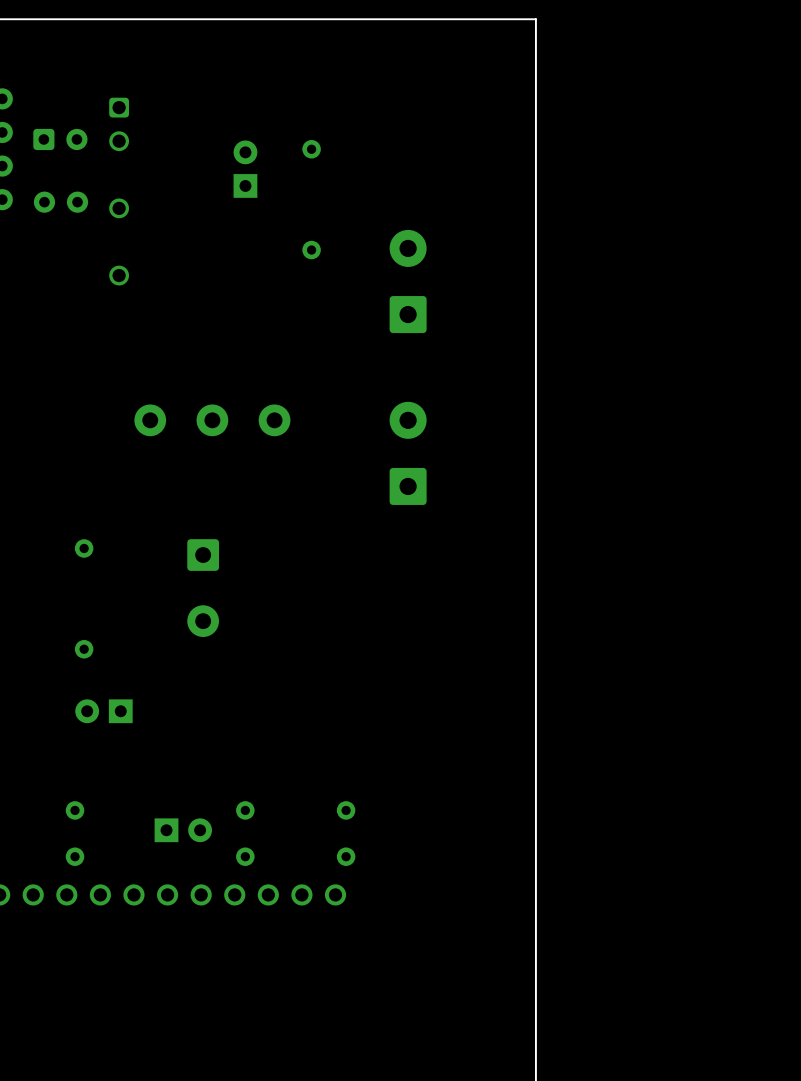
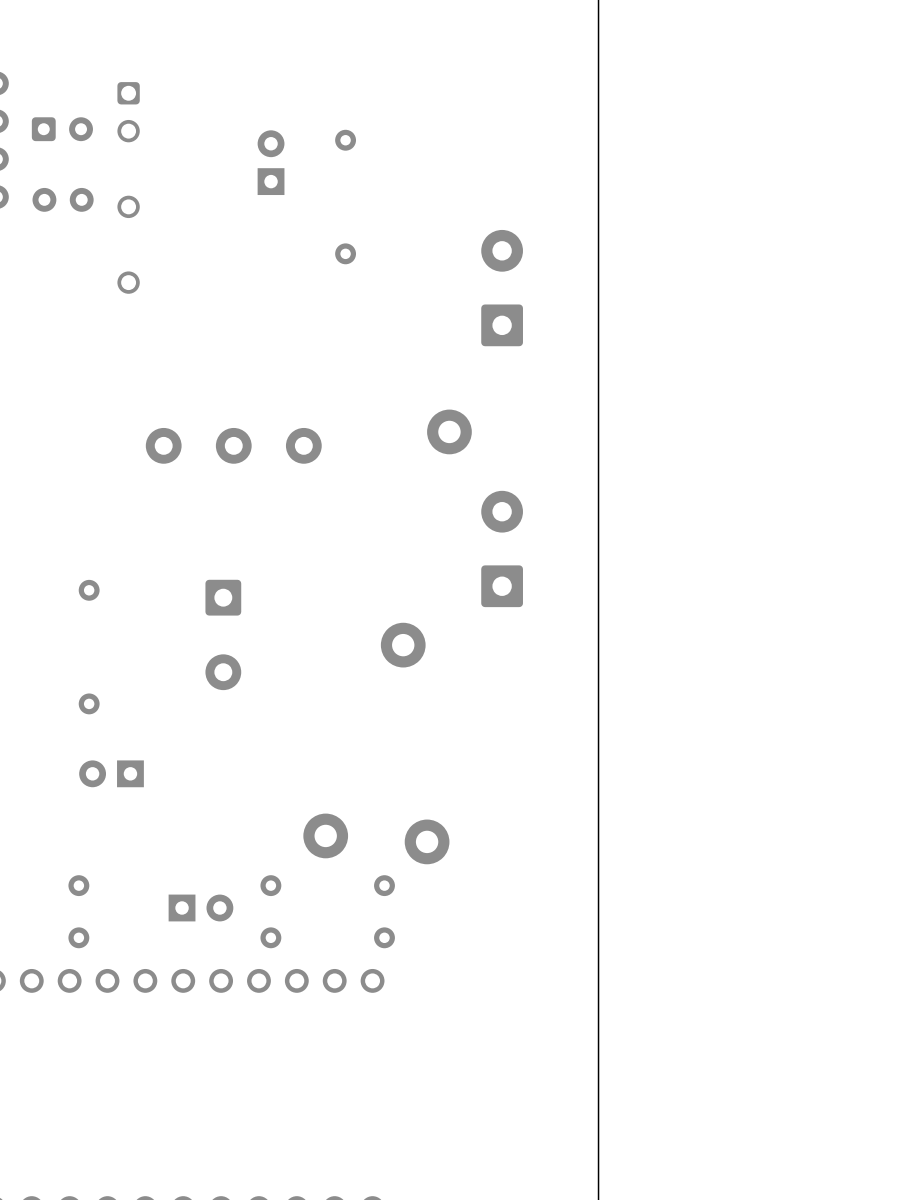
part position: (408, 281) -> (502, 288)
part: none -> (449, 431)
part position: (408, 453) -> (502, 548)
part: none -> (403, 645)
part: none -> (325, 835)
part: none -> (427, 841)

